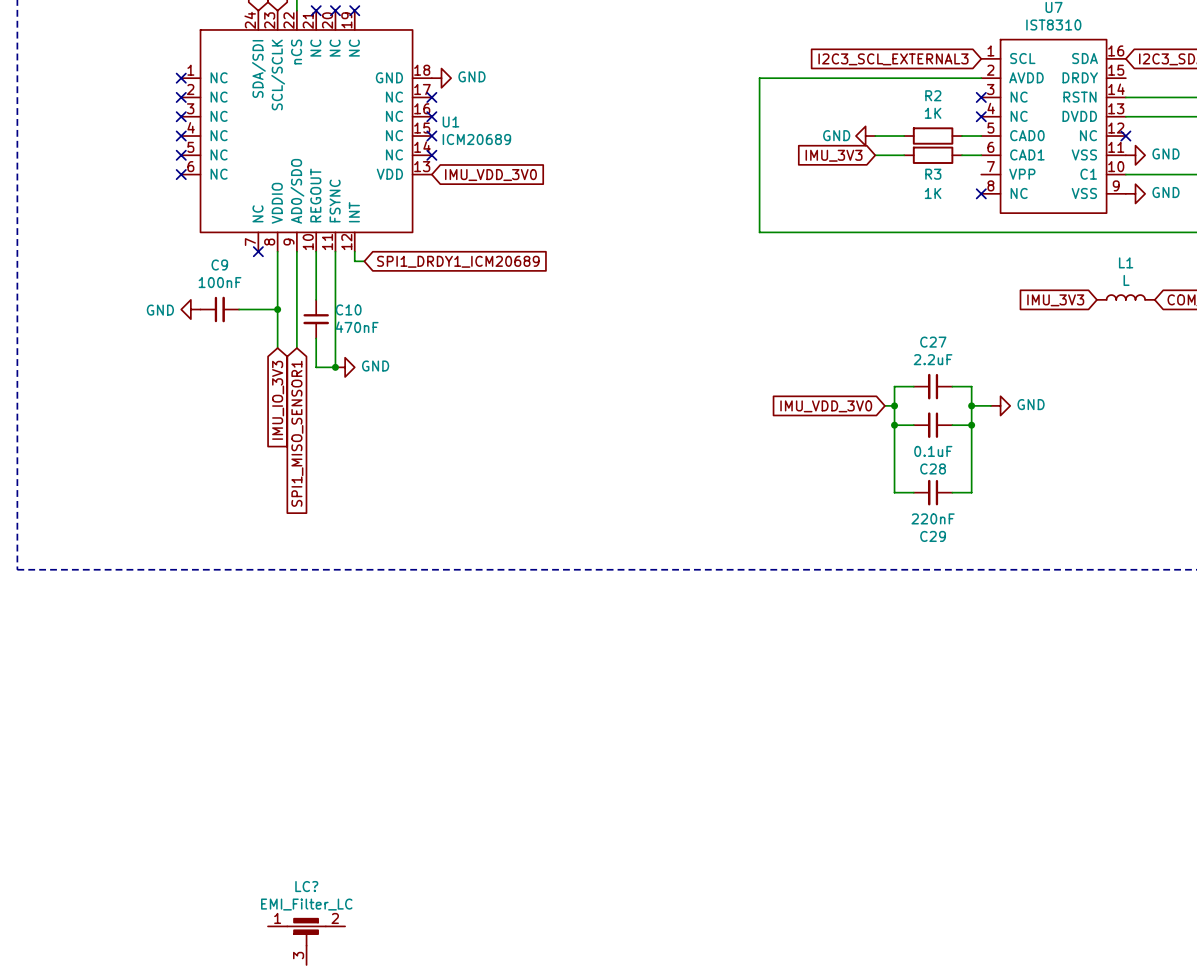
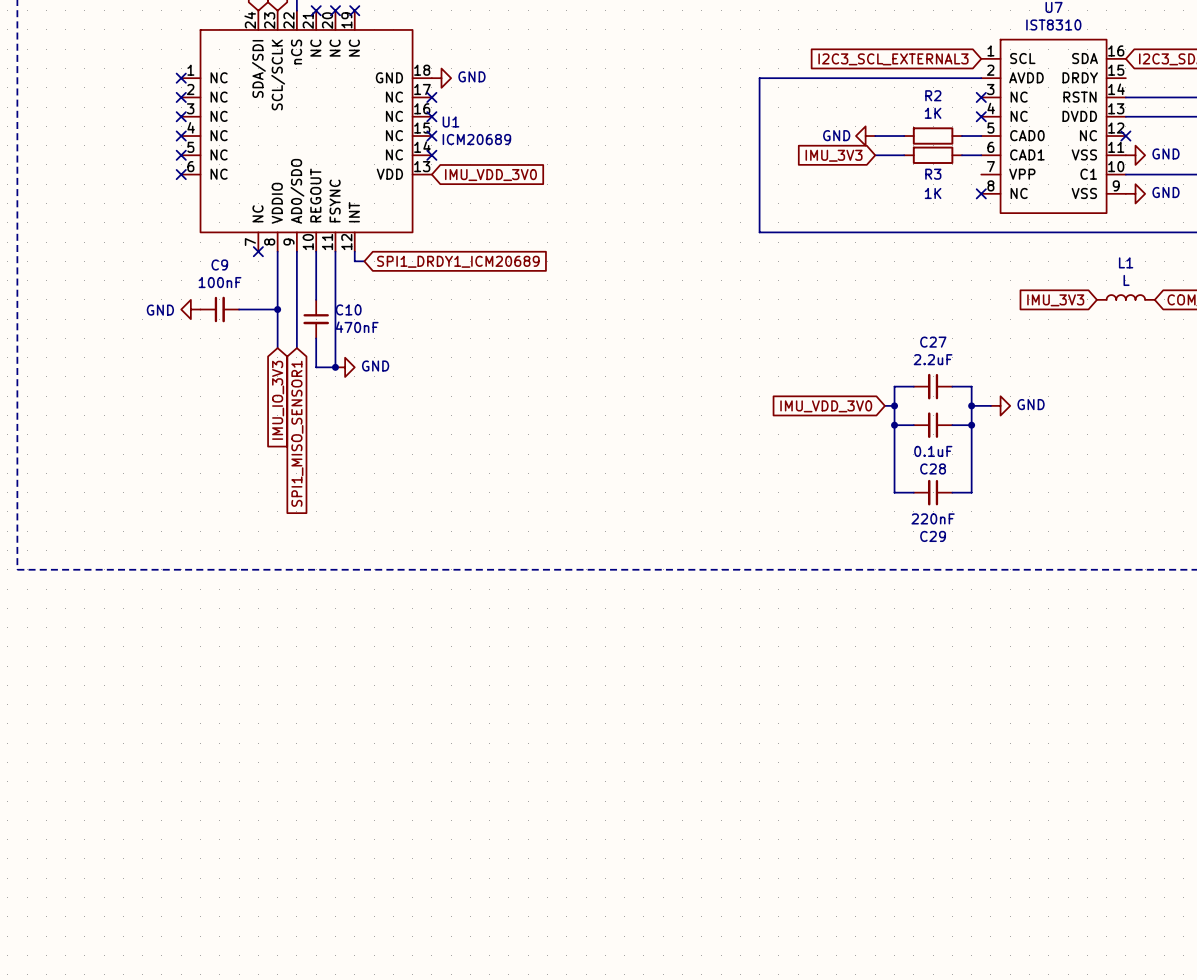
LC?: EMI_Filter_LC (306, 941) -> none

